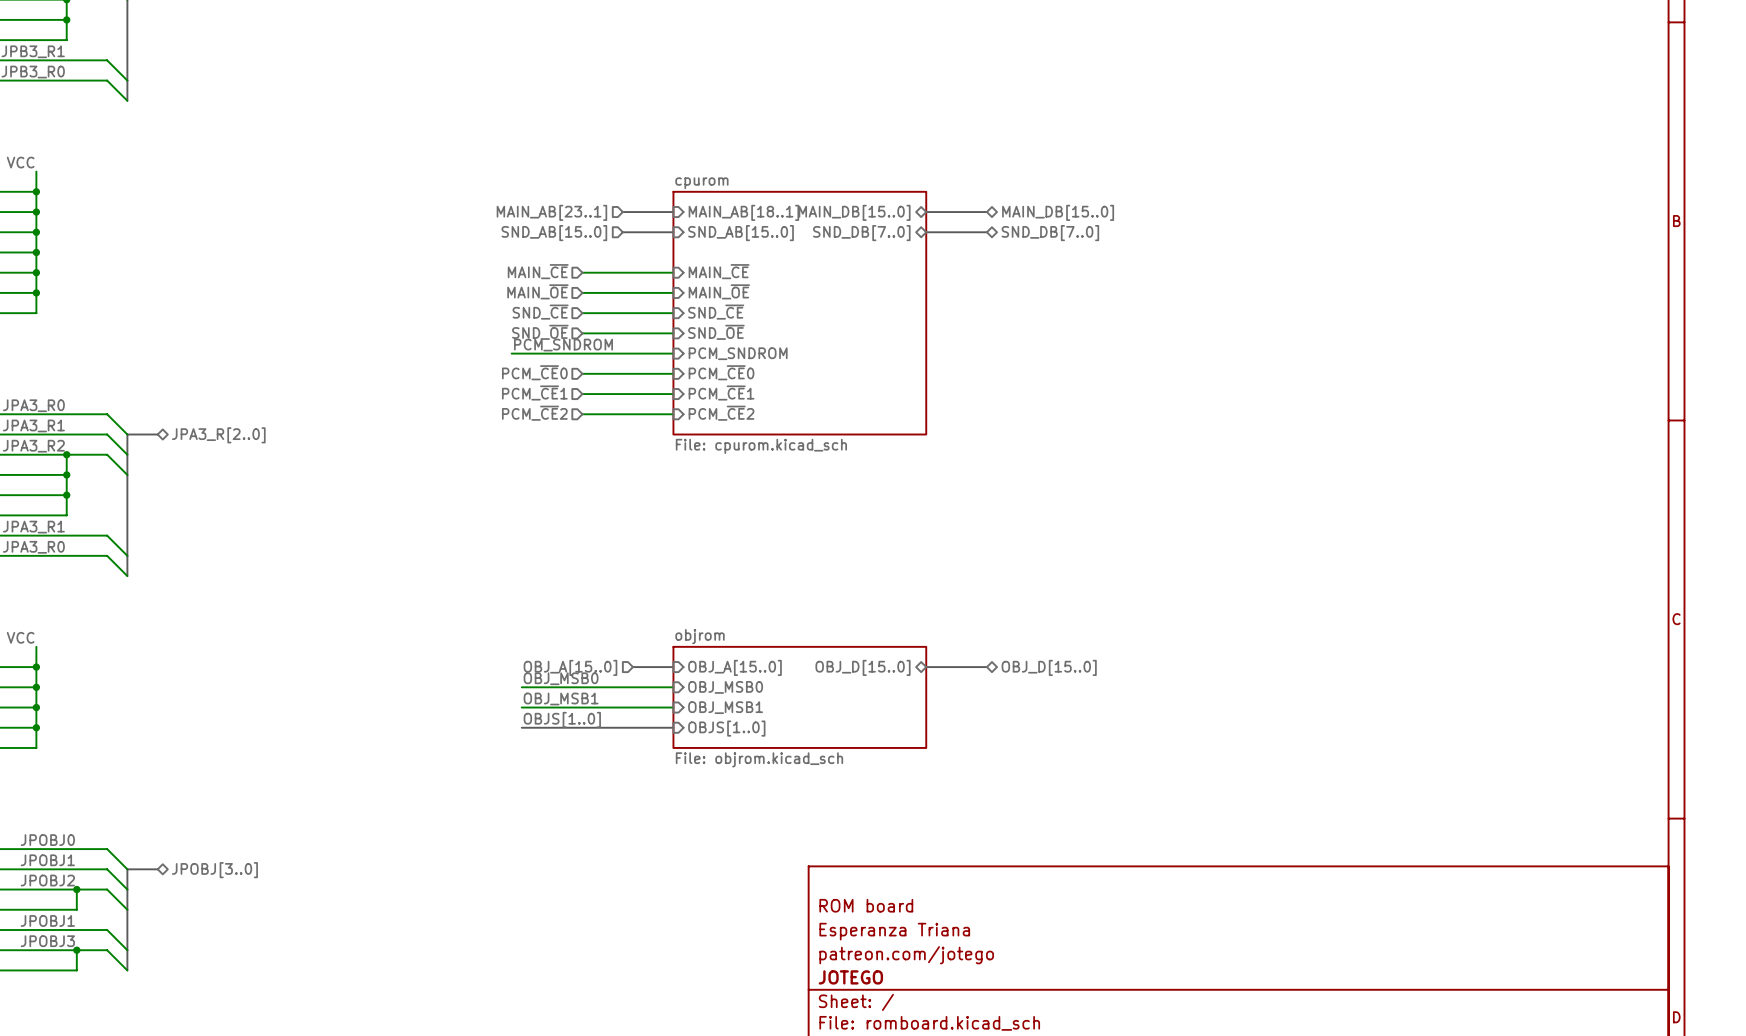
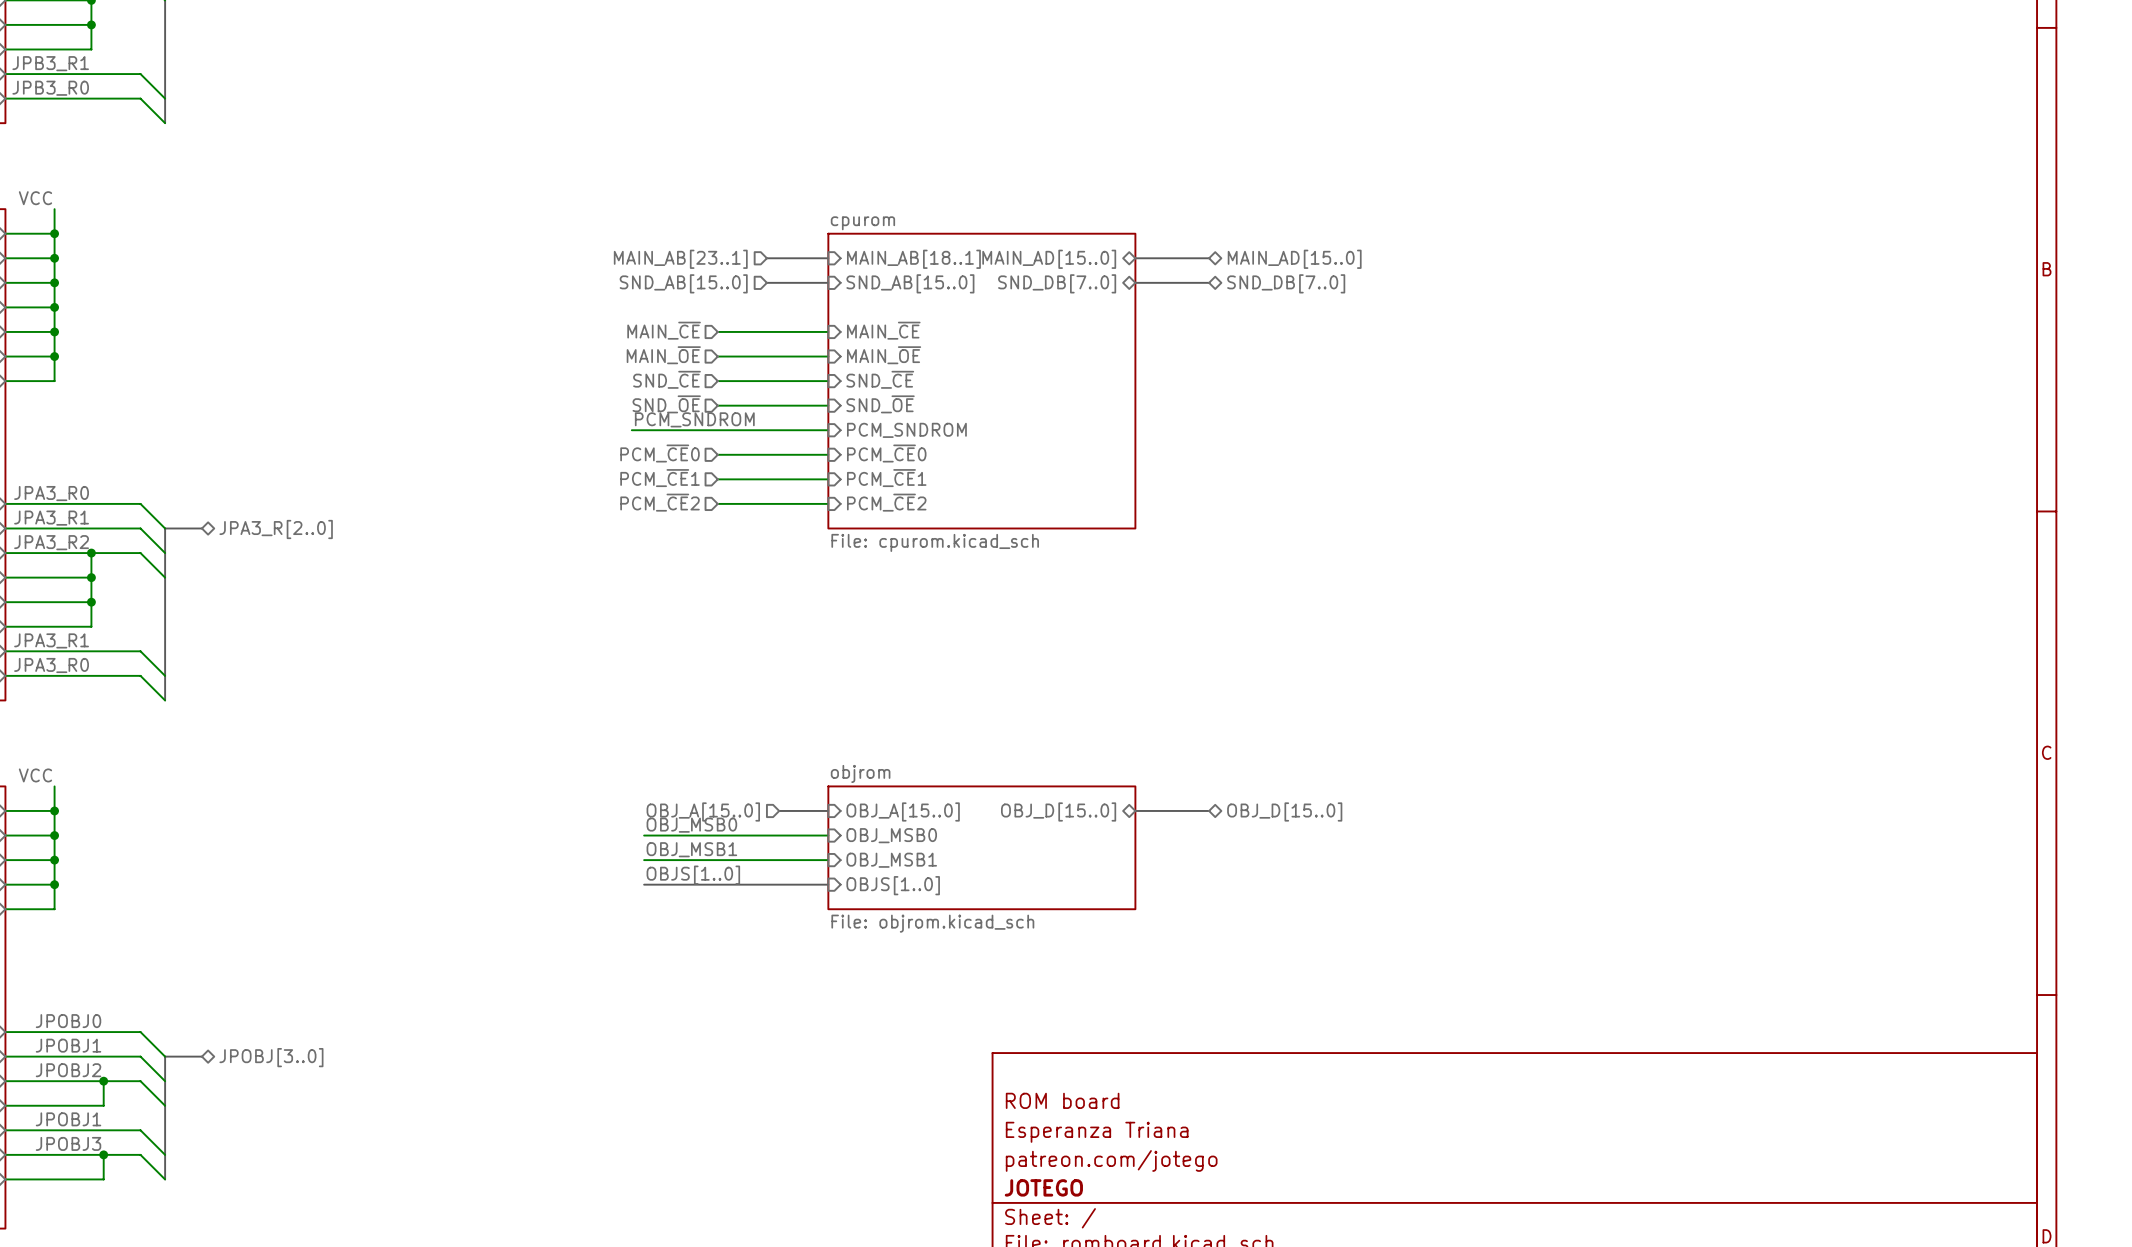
sheet pin: MAIN_DB[15..0] (854, 212) -> MAIN_AD[15..0] (1049, 259)
hierarchical label: MAIN_DB[15..0] (1058, 212) -> MAIN_AD[15..0] (1294, 259)

